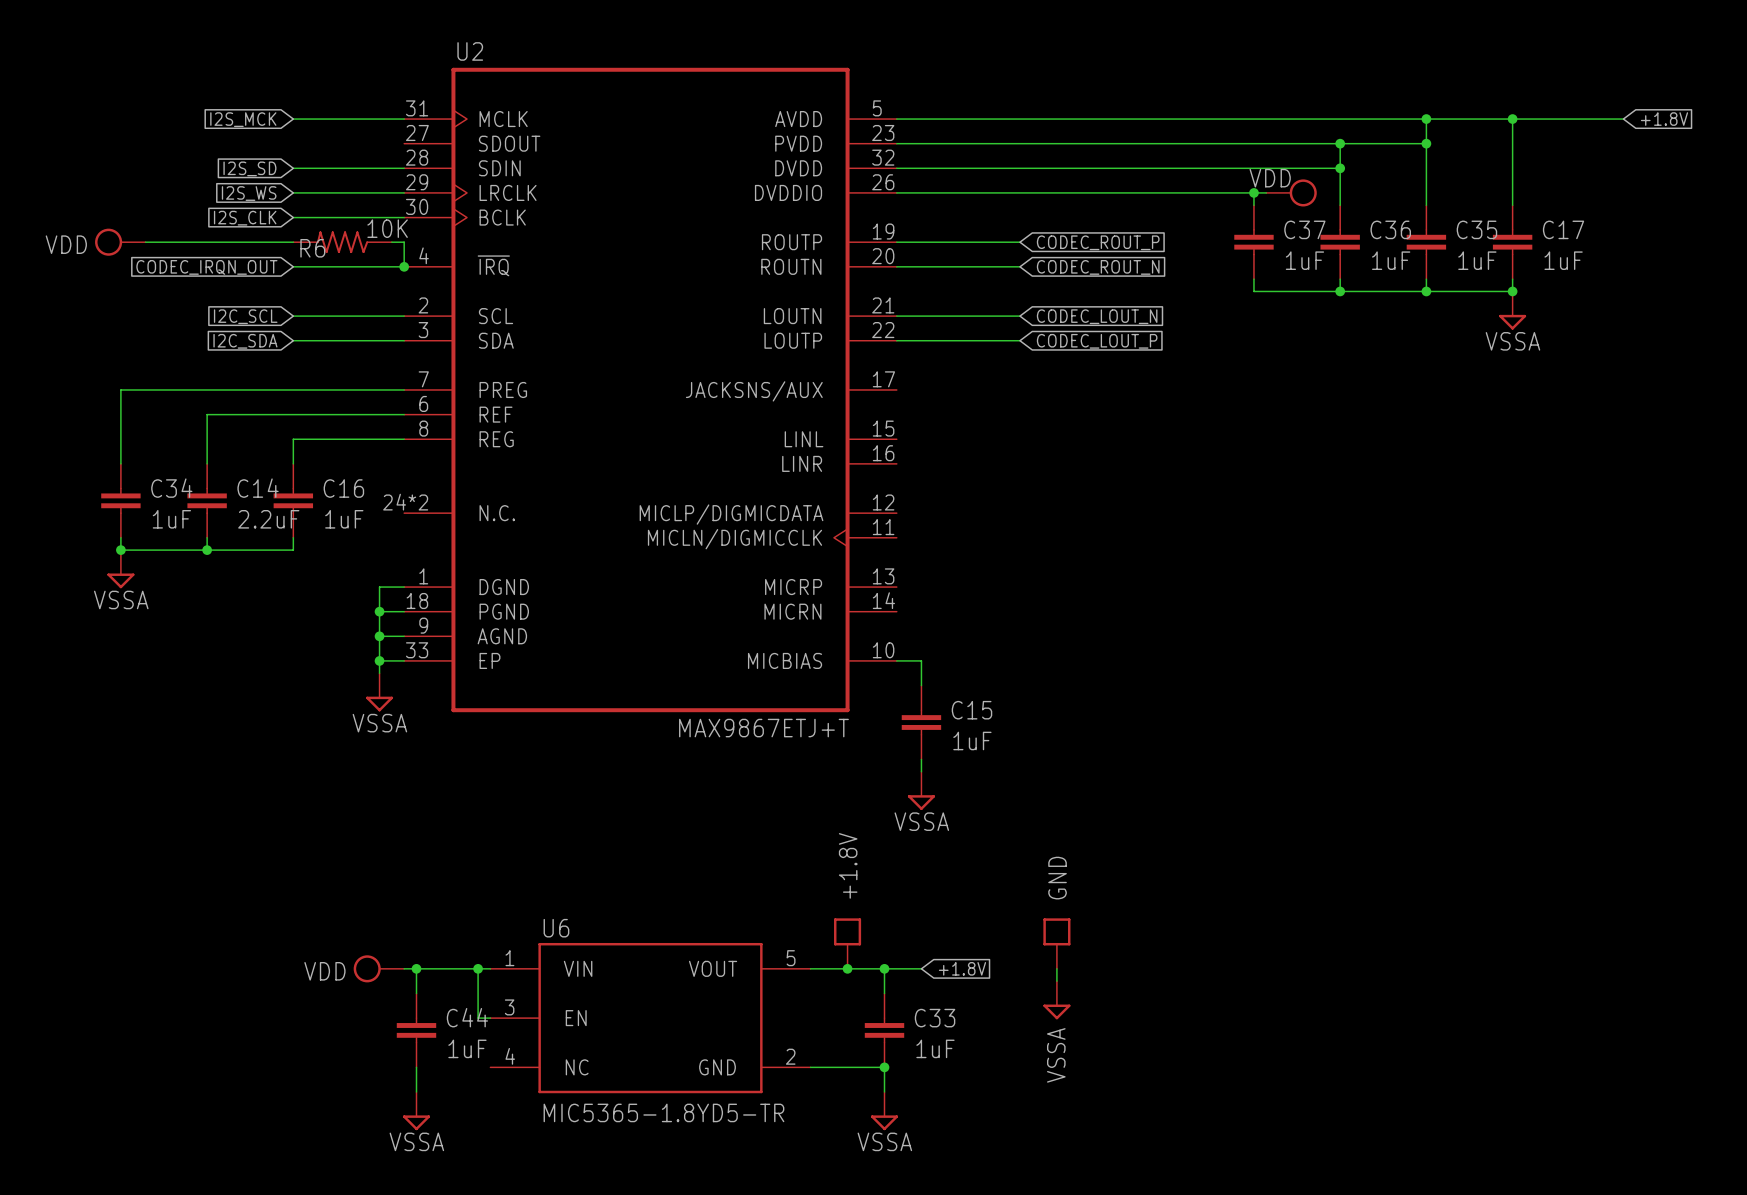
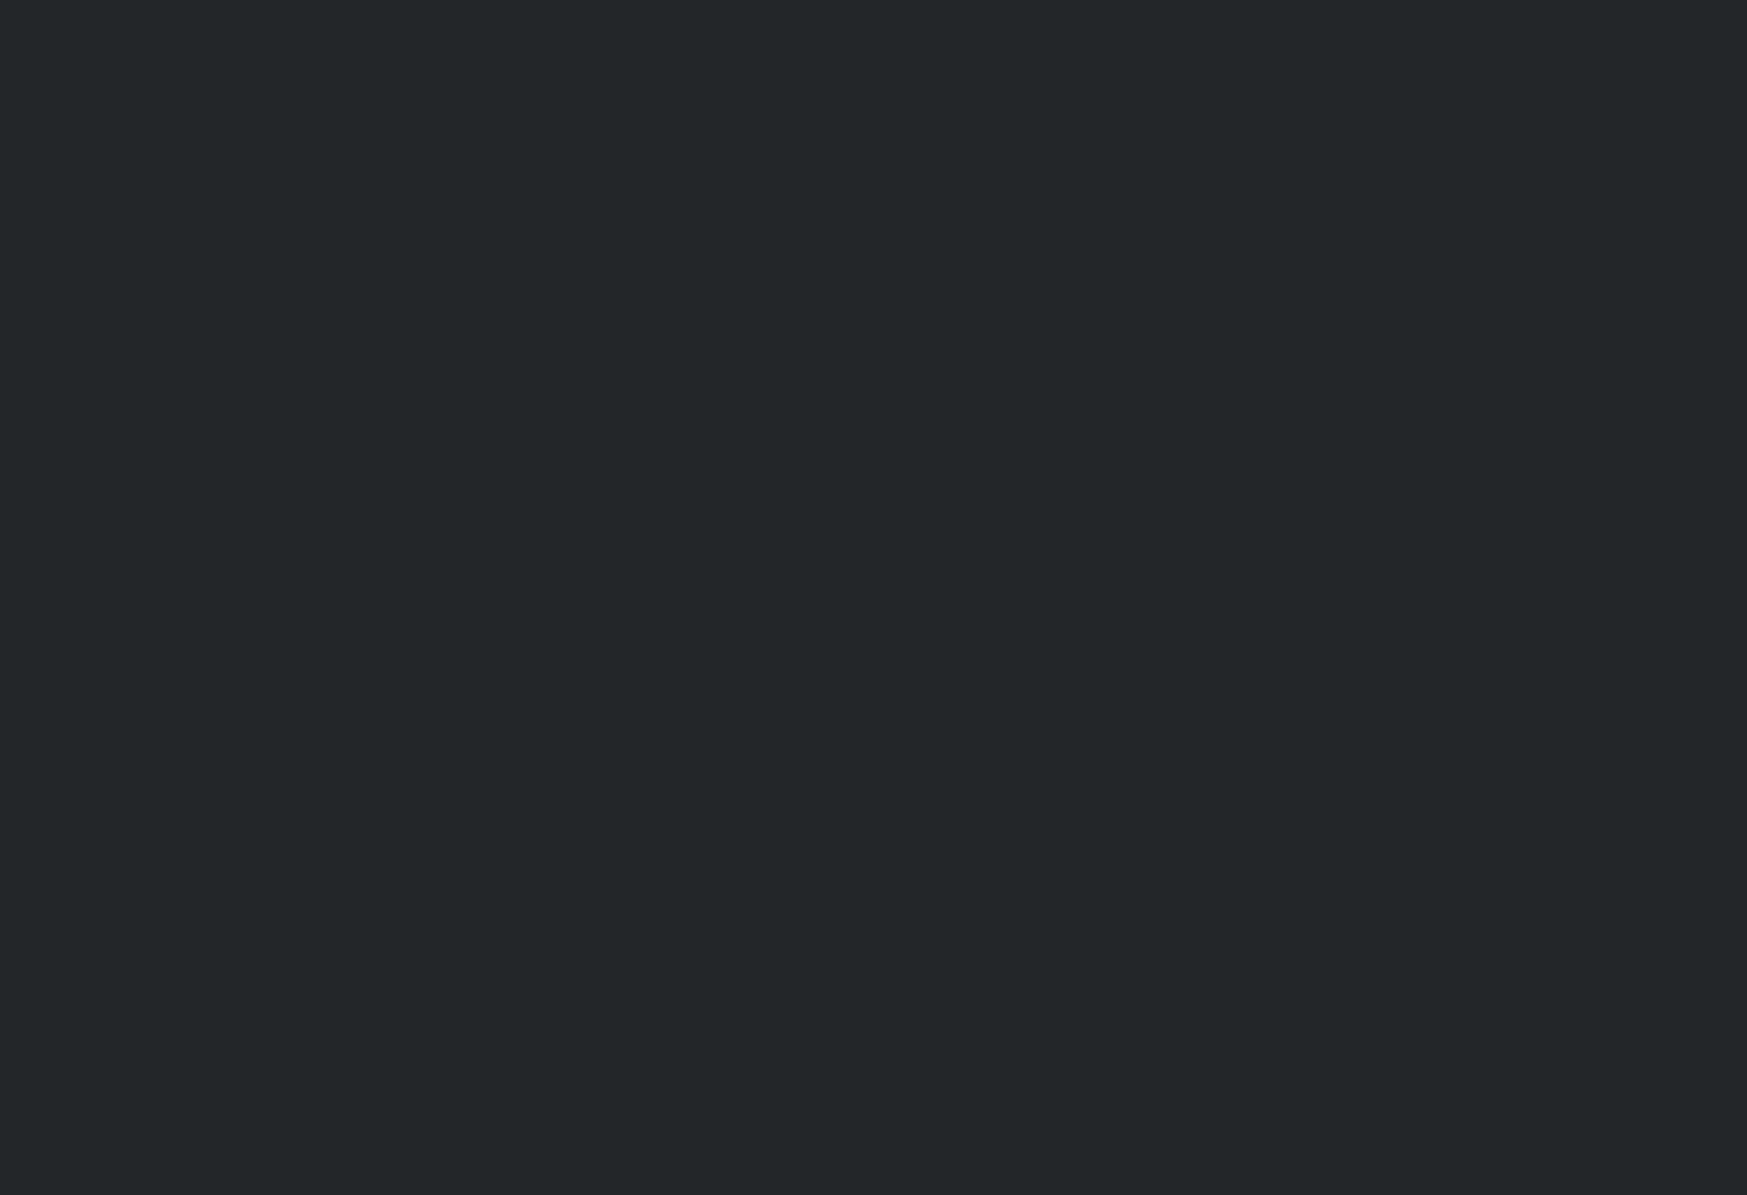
global label: I2S_MCK (243, 119) -> none
wire: (293, 119) (404, 119) -> none
wire: (896, 119) (1623, 119) -> none
wire: (1426, 119) (1426, 205) -> none
junction: (1426, 119) -> none
wire: (1512, 119) (1512, 205) -> none
junction: (1512, 119) -> none
global label: +1.8V (1664, 119) -> none
wire: (896, 143) (1426, 143) -> none
wire: (1340, 143) (1340, 205) -> none
junction: (1340, 143) -> none
junction: (1426, 143) -> none
global label: I2S_SD (249, 168) -> none
wire: (293, 168) (404, 168) -> none
wire: (896, 168) (1340, 168) -> none
junction: (1340, 168) -> none
wire: (293, 192) (404, 192) -> none
wire: (896, 192) (1266, 192) -> none
wire: (1253, 192) (1253, 205) -> none
junction: (1253, 192) -> none
power symbol: VDD (1291, 192) -> none
global label: I2S_WS (249, 193) -> none
wire: (293, 217) (404, 217) -> none
global label: I2S_CLK (245, 218) -> none
power symbol: VDD (120, 242) -> none
wire: (145, 242) (293, 242) -> none
R6: 10K (342, 242) -> none
wire: (391, 242) (404, 242) (404, 266) (293, 266) -> none
wire: (896, 242) (1019, 242) -> none
global label: CODEC_ROUT_P (1098, 242) -> none
C37: 1uF (1253, 242) -> none
C36: 1uF (1340, 242) -> none
C35: 1uF (1426, 242) -> none
C17: 1uF (1512, 242) -> none
junction: (404, 266) -> none
wire: (896, 266) (1019, 266) -> none
global label: CODEC_IRQN_OUT (206, 267) -> none
global label: CODEC_ROUT_N (1098, 267) -> none
wire: (1253, 279) (1253, 291) (1512, 291) (1512, 279) -> none
wire: (1340, 279) (1340, 291) -> none
wire: (1426, 279) (1426, 291) -> none
junction: (1340, 291) -> none
junction: (1426, 291) -> none
junction: (1512, 291) -> none
power symbol: VSSA (1512, 310) -> none
global label: I2C_SCL (245, 316) -> none
wire: (293, 316) (404, 316) -> none
wire: (896, 316) (1019, 316) -> none
global label: CODEC_LOUT_N (1097, 316) -> none
wire: (293, 340) (404, 340) -> none
wire: (896, 340) (1019, 340) -> none
global label: I2C_SDA (245, 341) -> none
global label: CODEC_LOUT_P (1097, 341) -> none
wire: (404, 389) (120, 389) (120, 463) -> none
U2: MAX9867ETJ+T (650, 389) -> none
wire: (404, 414) (207, 414) (207, 463) -> none
wire: (404, 439) (293, 439) (293, 463) -> none
C34: 1uF (120, 500) -> none
C14: 2.2uF (207, 500) -> none
C16: 1uF (293, 500) -> none
wire: (120, 537) (120, 550) (293, 550) (293, 537) -> none
wire: (207, 537) (207, 550) -> none
junction: (120, 550) -> none
junction: (207, 550) -> none
power symbol: VSSA (120, 569) -> none
wire: (404, 587) (379, 587) (379, 673) -> none
wire: (379, 611) (404, 611) -> none
junction: (379, 611) -> none
wire: (379, 636) (404, 636) -> none
junction: (379, 636) -> none
wire: (379, 660) (404, 660) -> none
junction: (379, 660) -> none
wire: (896, 660) (921, 660) (921, 685) -> none
power symbol: VSSA (379, 692) -> none
C15: 1uF (921, 722) -> none
wire: (921, 759) (921, 771) -> none
power symbol: VSSA (921, 790) -> none
+1.8V: (847, 943) -> none
GND: (1056, 943) -> none
power symbol: VDD (378, 968) -> none
wire: (404, 968) (490, 968) -> none
wire: (416, 968) (416, 993) -> none
junction: (416, 968) -> none
wire: (478, 968) (478, 1018) (490, 1018) -> none
junction: (478, 968) -> none
wire: (810, 968) (921, 968) -> none
junction: (847, 968) -> none
wire: (884, 968) (884, 993) -> none
junction: (884, 968) -> none
global label: +1.8V (962, 968) -> none
wire: (1056, 968) (1056, 981) -> none
power symbol: VSSA (1056, 1000) -> none
U6: (650, 1018) -> none
C44: 1uF (416, 1030) -> none
C33: 1uF (884, 1030) -> none
wire: (416, 1067) (416, 1092) -> none
wire: (810, 1067) (884, 1067) (884, 1092) -> none
junction: (884, 1067) -> none
power symbol: VSSA (416, 1111) -> none
power symbol: VSSA (884, 1111) -> none

